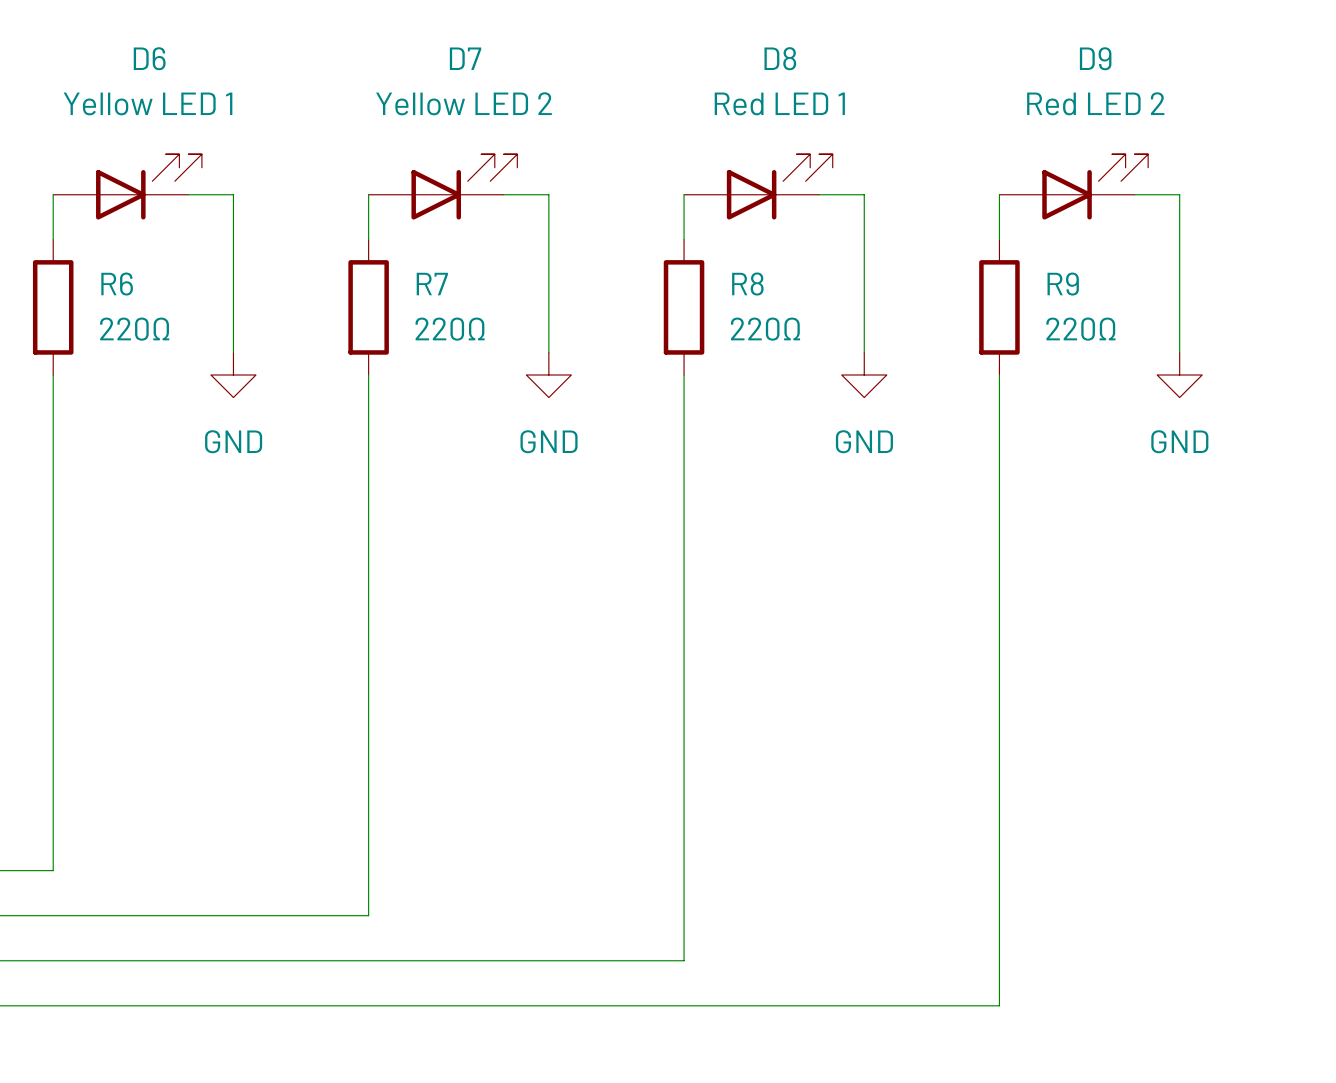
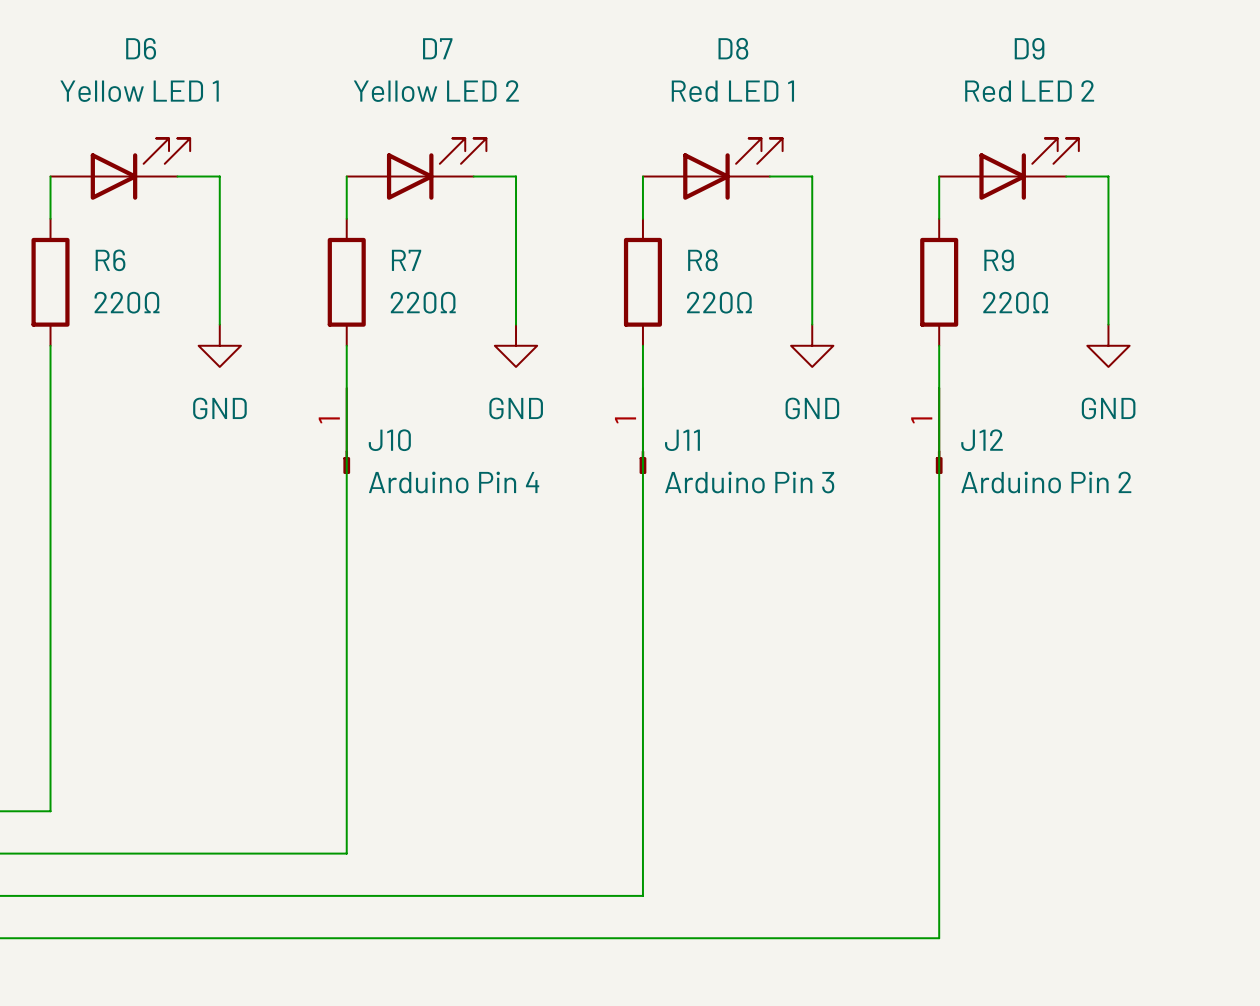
J10: none -> Arduino Pin 4 (346, 431)
J11: none -> Arduino Pin 3 (642, 431)
J12: none -> Arduino Pin 2 (939, 431)

